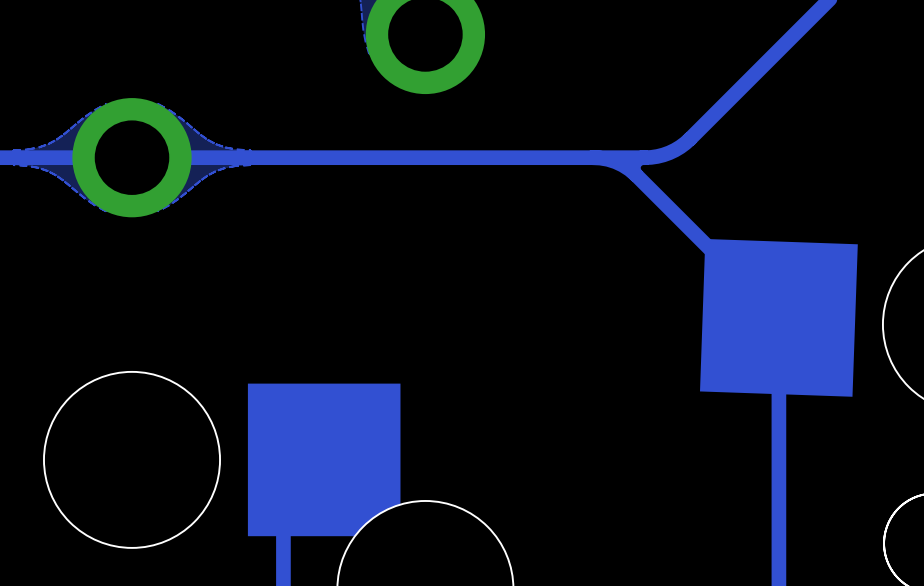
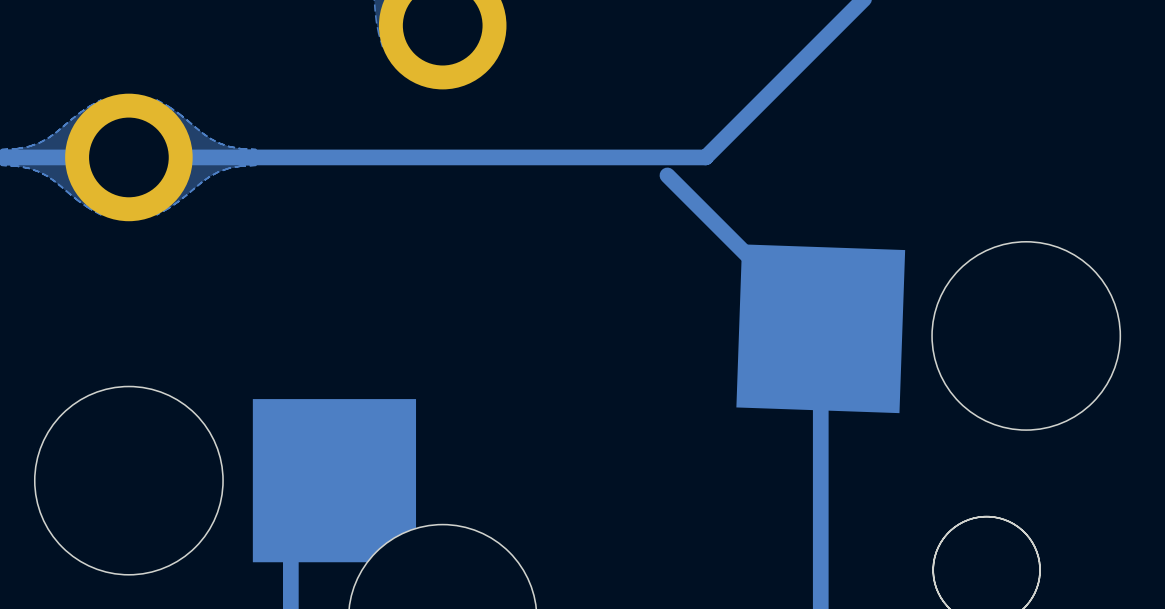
track: (689, 139) (669, 152) (638, 159) (633, 165) (635, 174) (615, 161) (592, 157) -> (725, 137) (705, 157) (677, 157)

